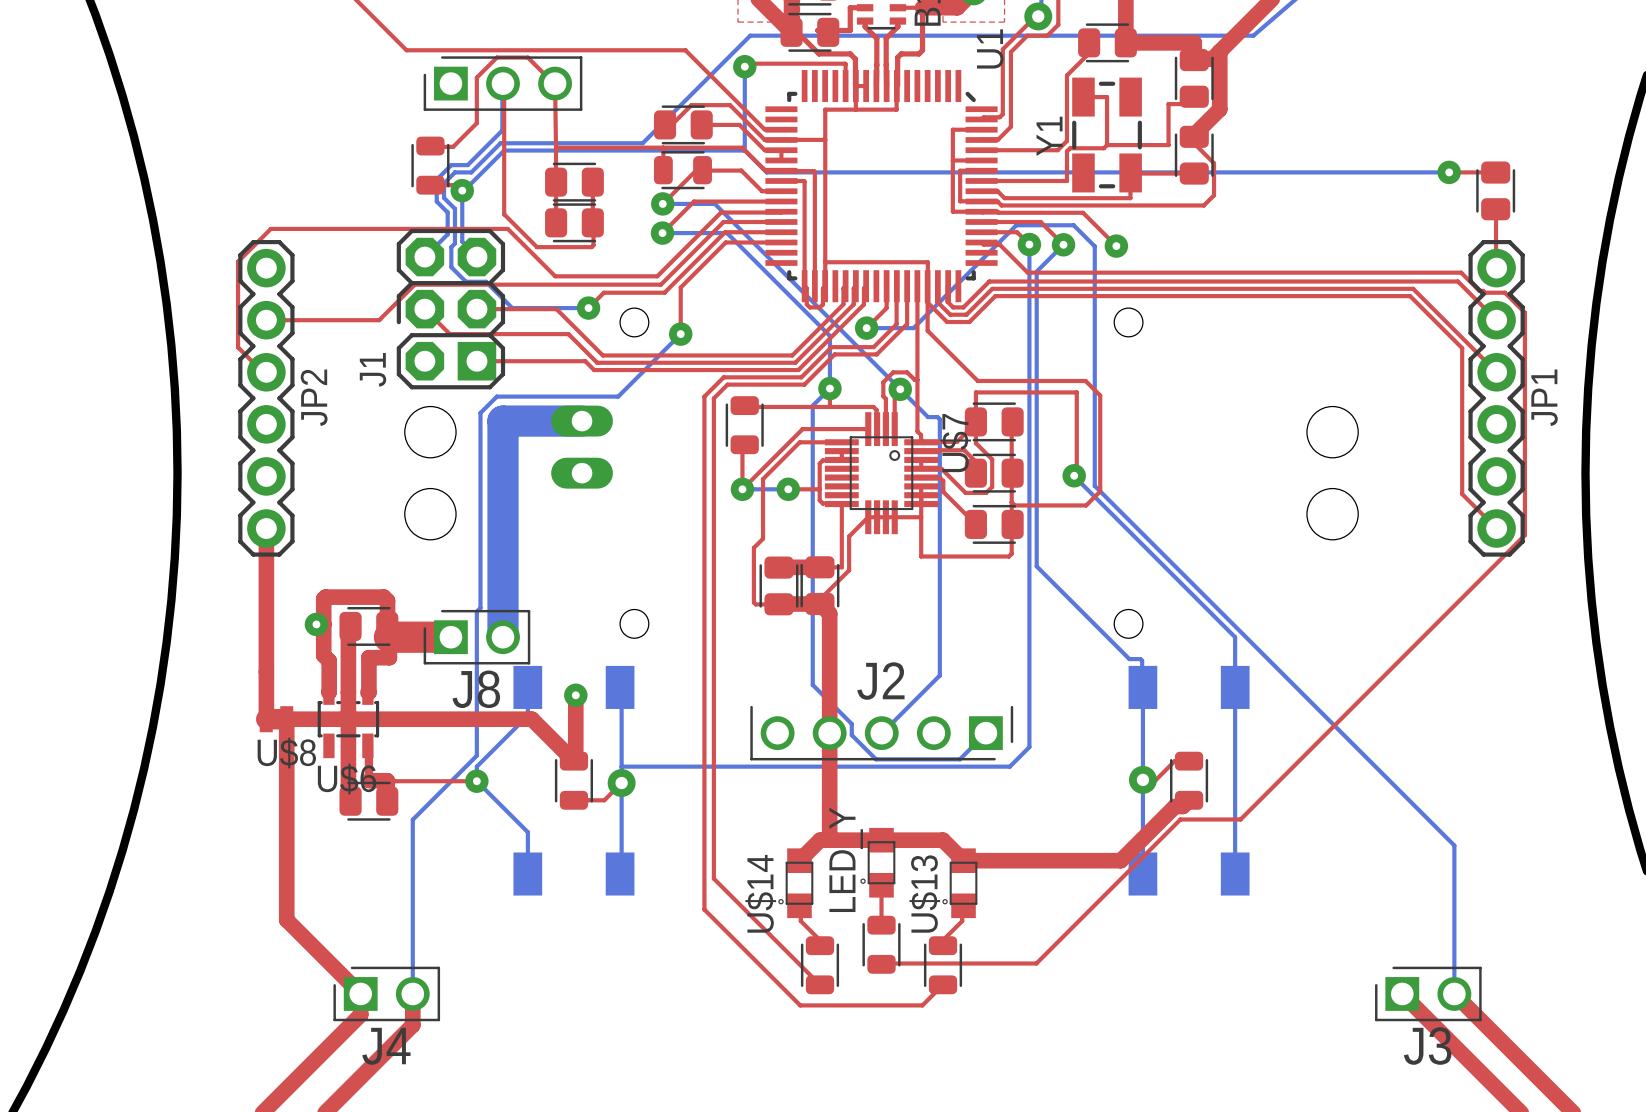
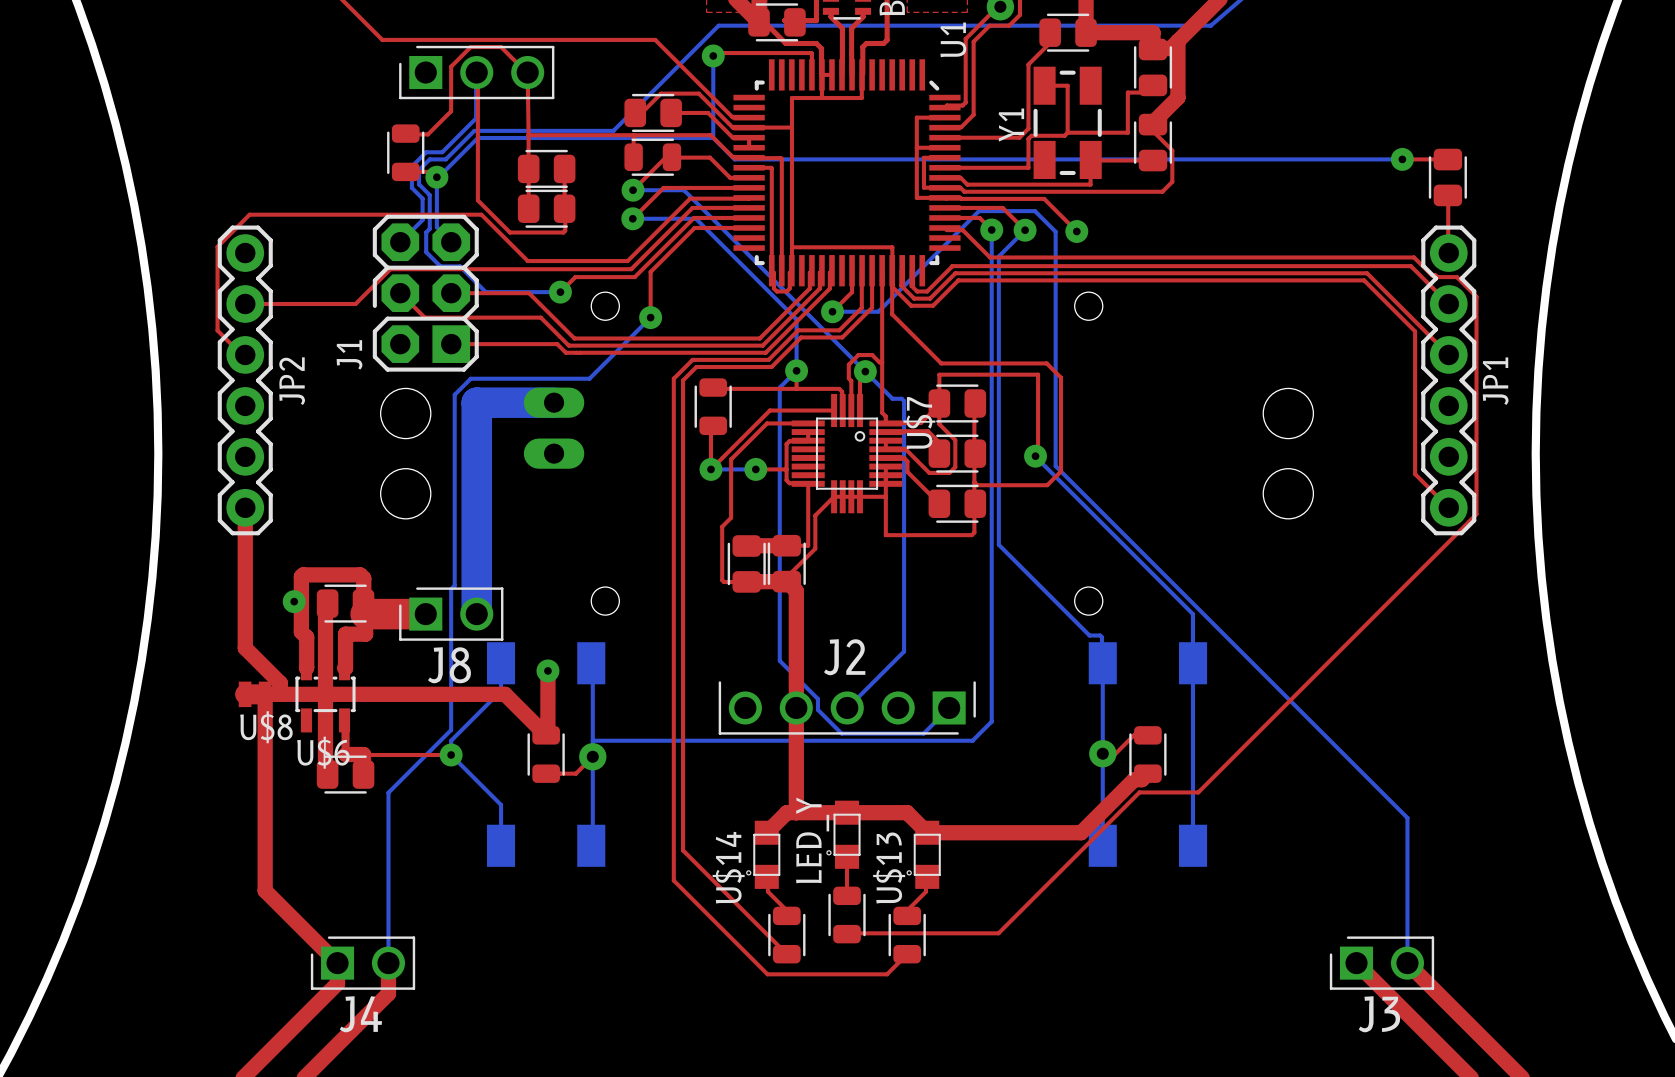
top track: (266, 671) (266, 719) -> (245, 648) (280, 683) (280, 694)

